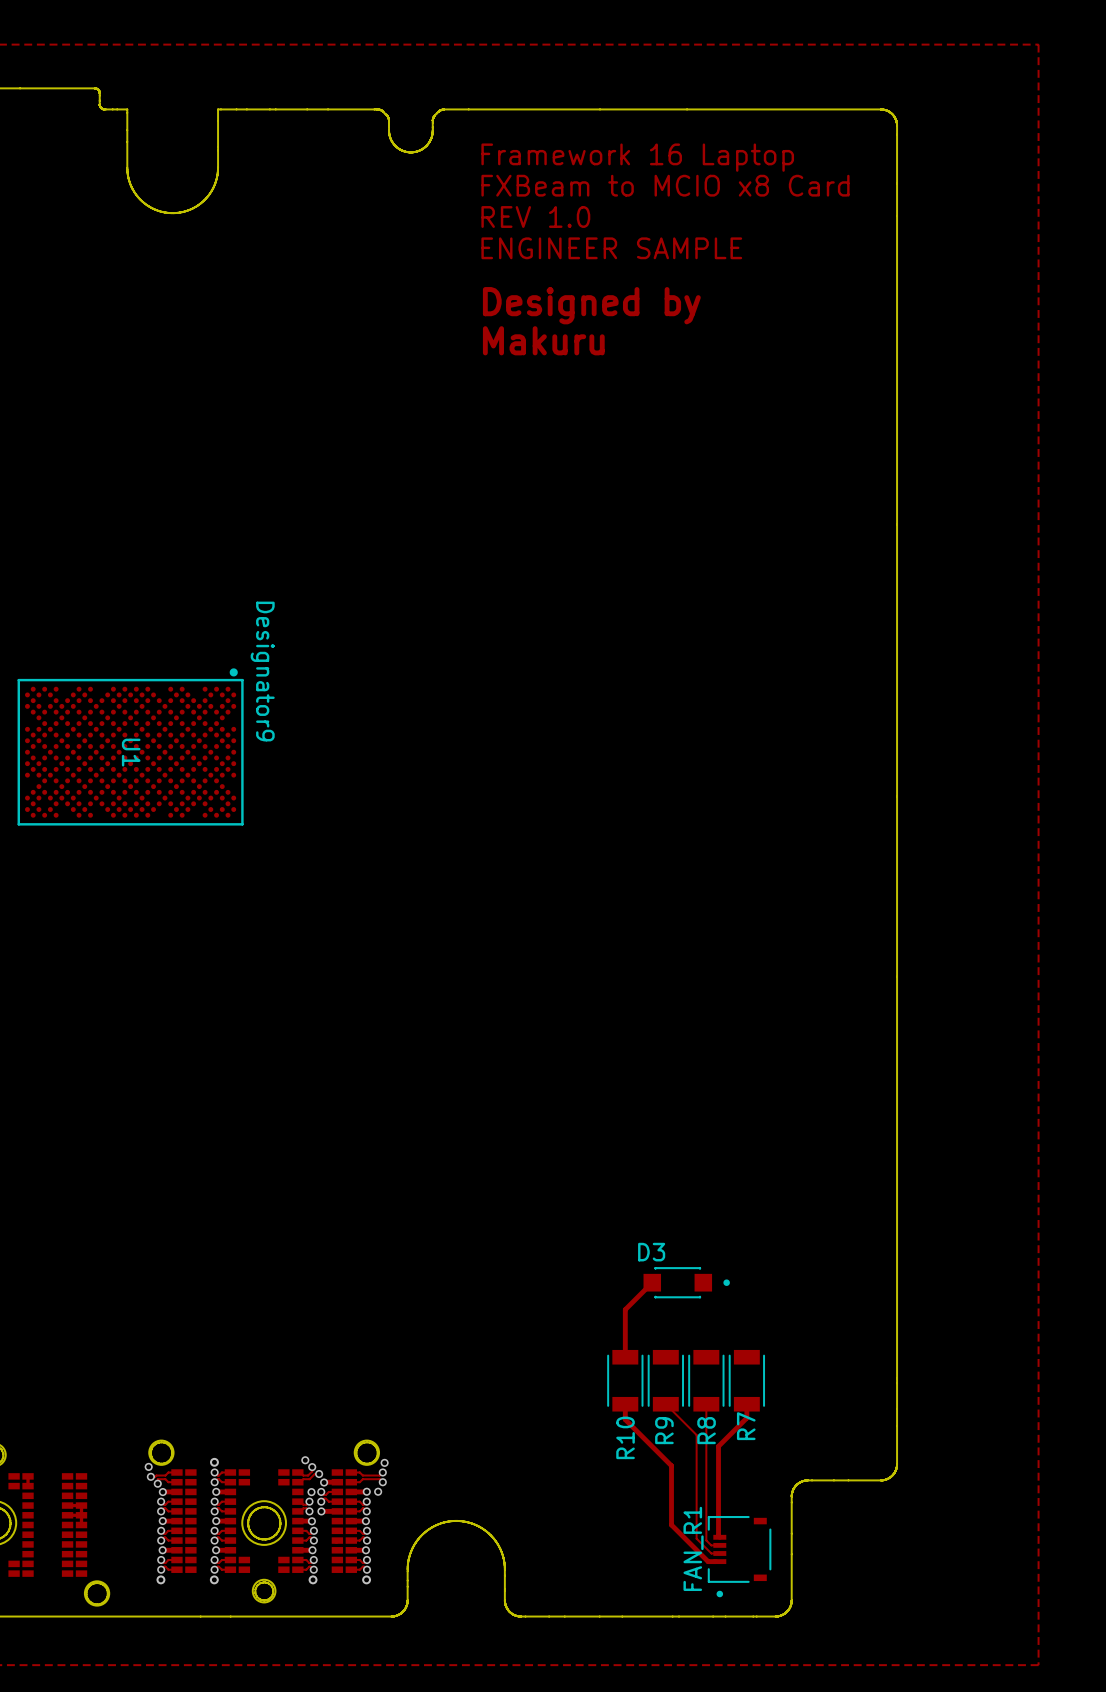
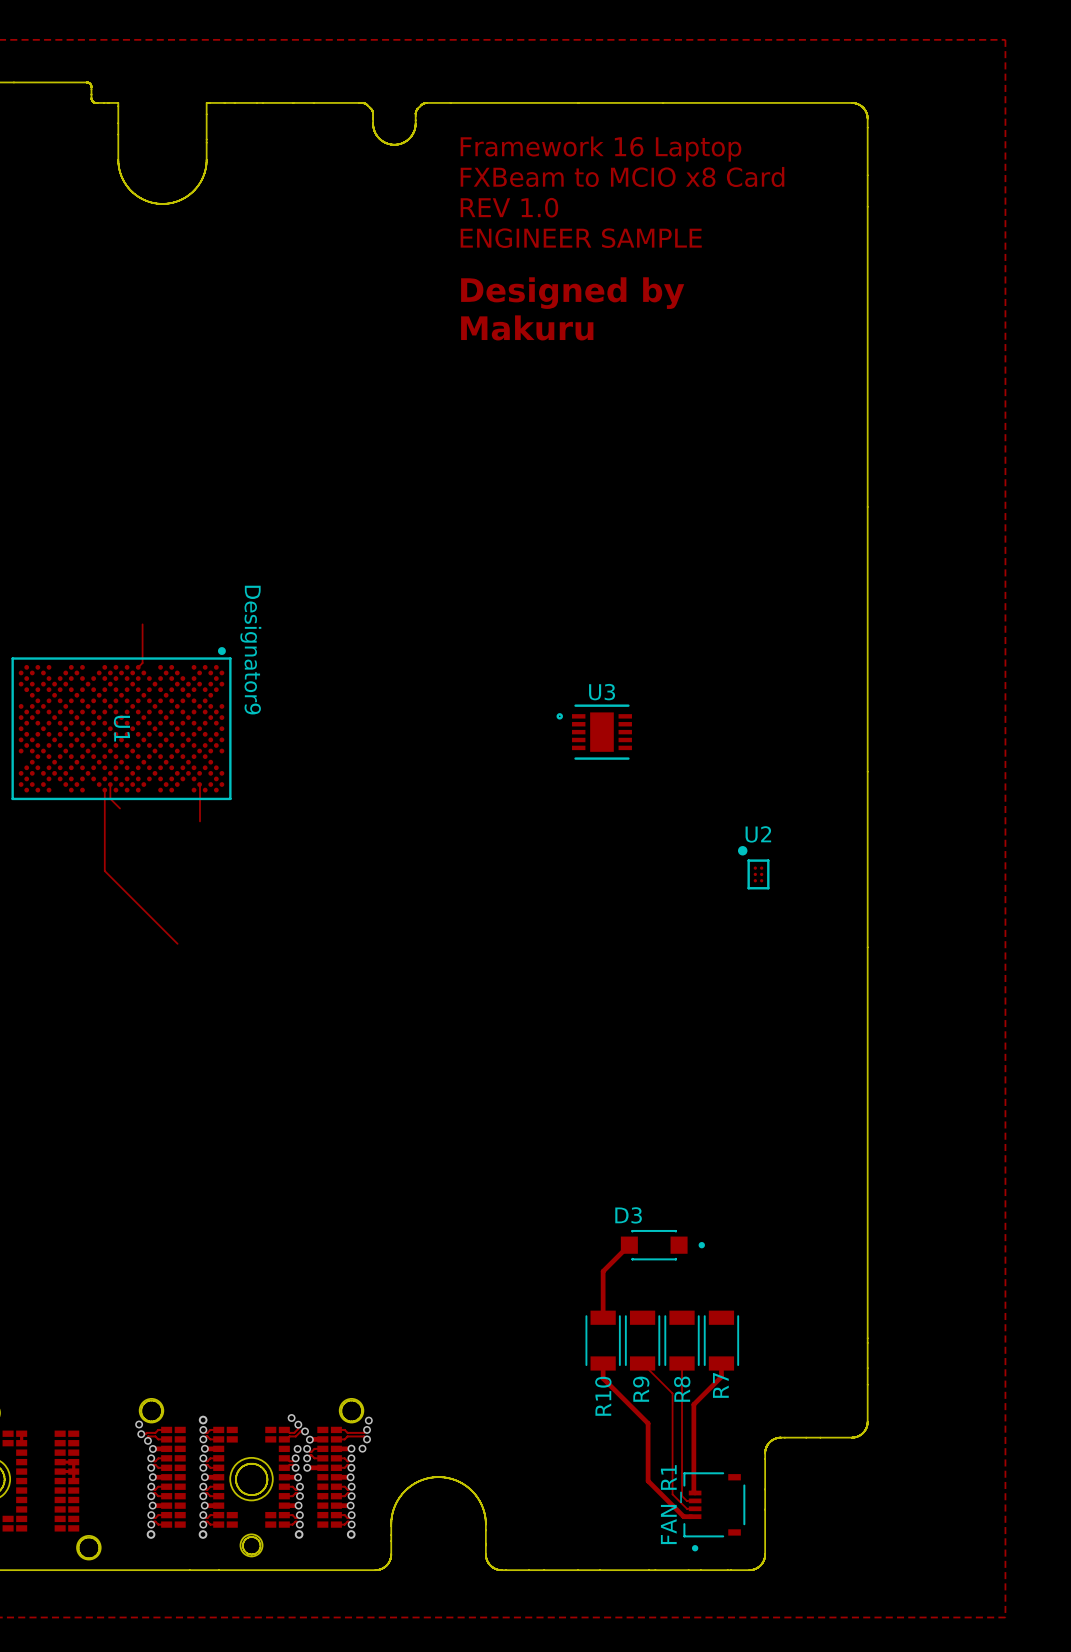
track: none -> (142, 624) (142, 663) (138, 667)
U3: none -> (594, 732)
track: none -> (110, 784) (110, 798) (120, 808)
track: none -> (200, 784) (200, 821)
track: none -> (104, 790) (104, 871) (177, 943)
U2: none -> (753, 867)

